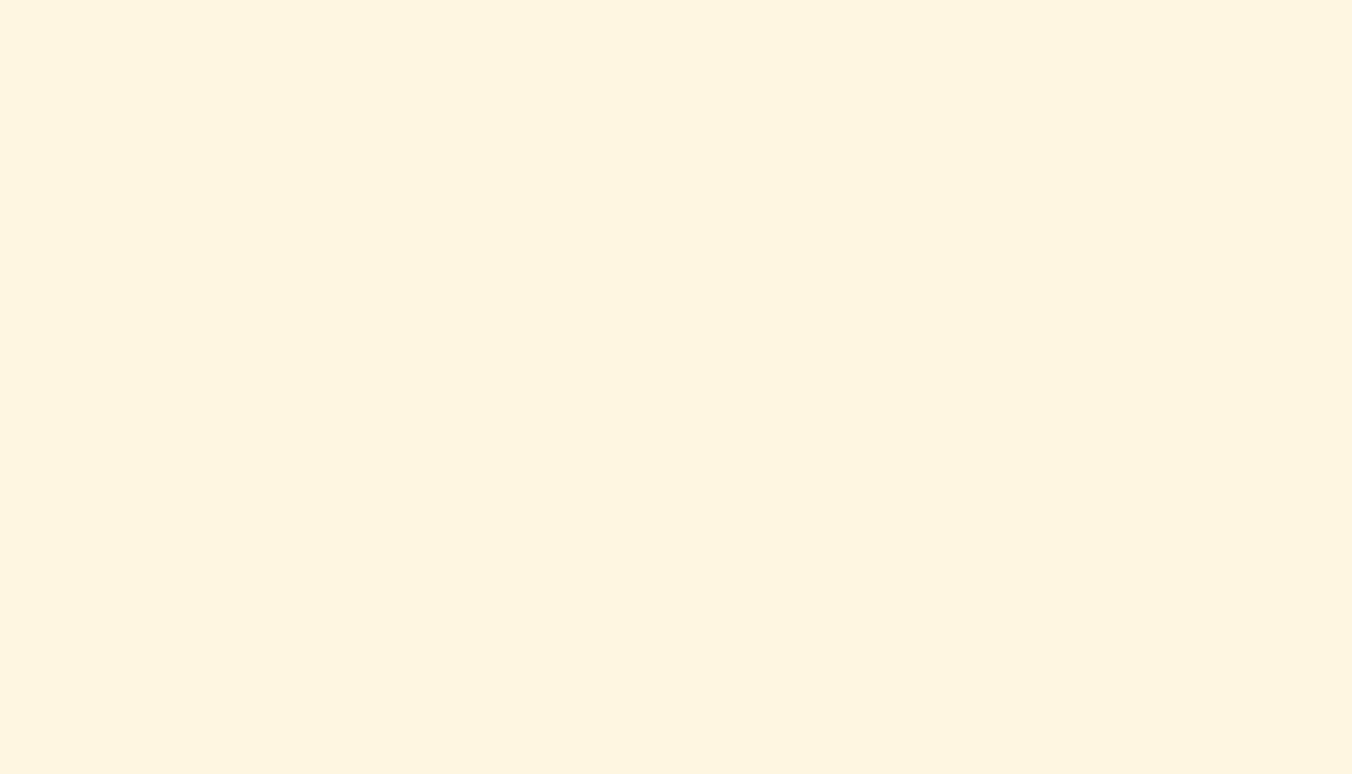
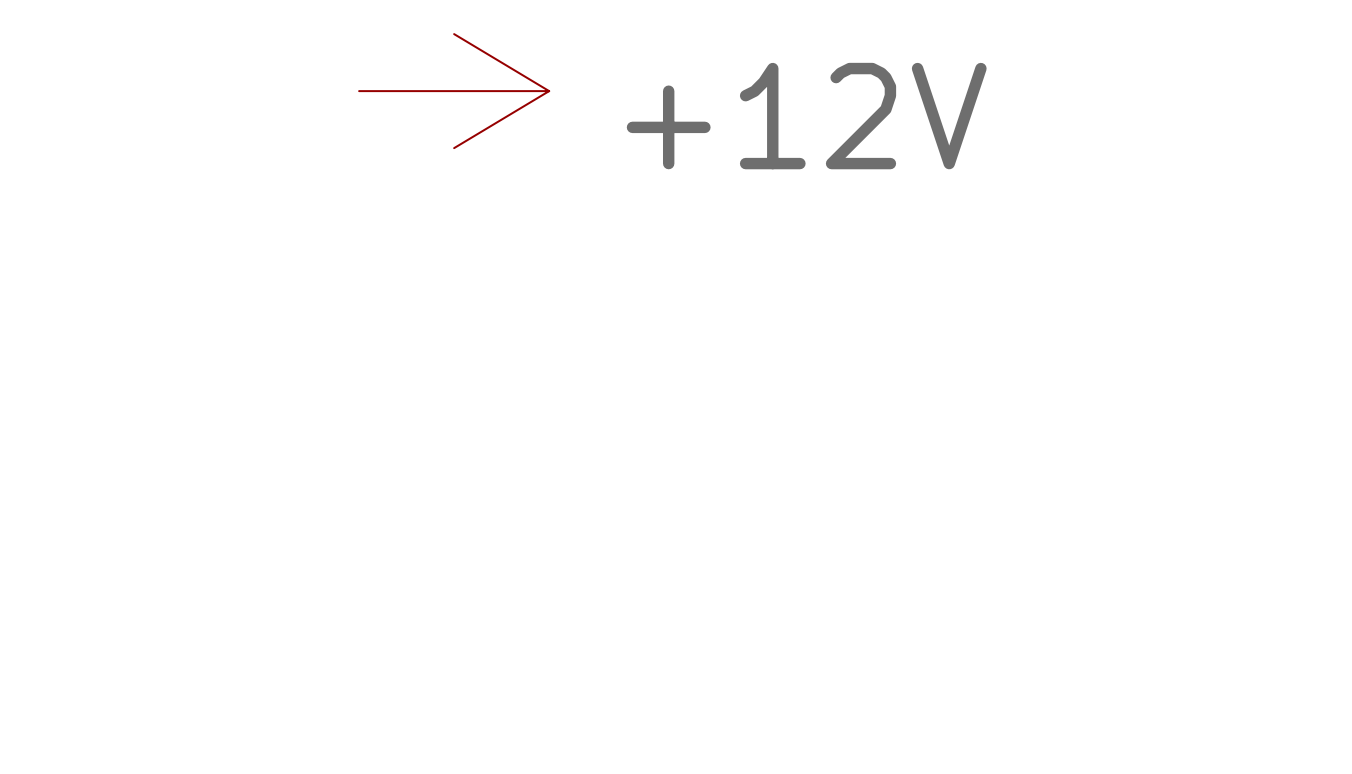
power symbol: none -> +12V (454, 91)

